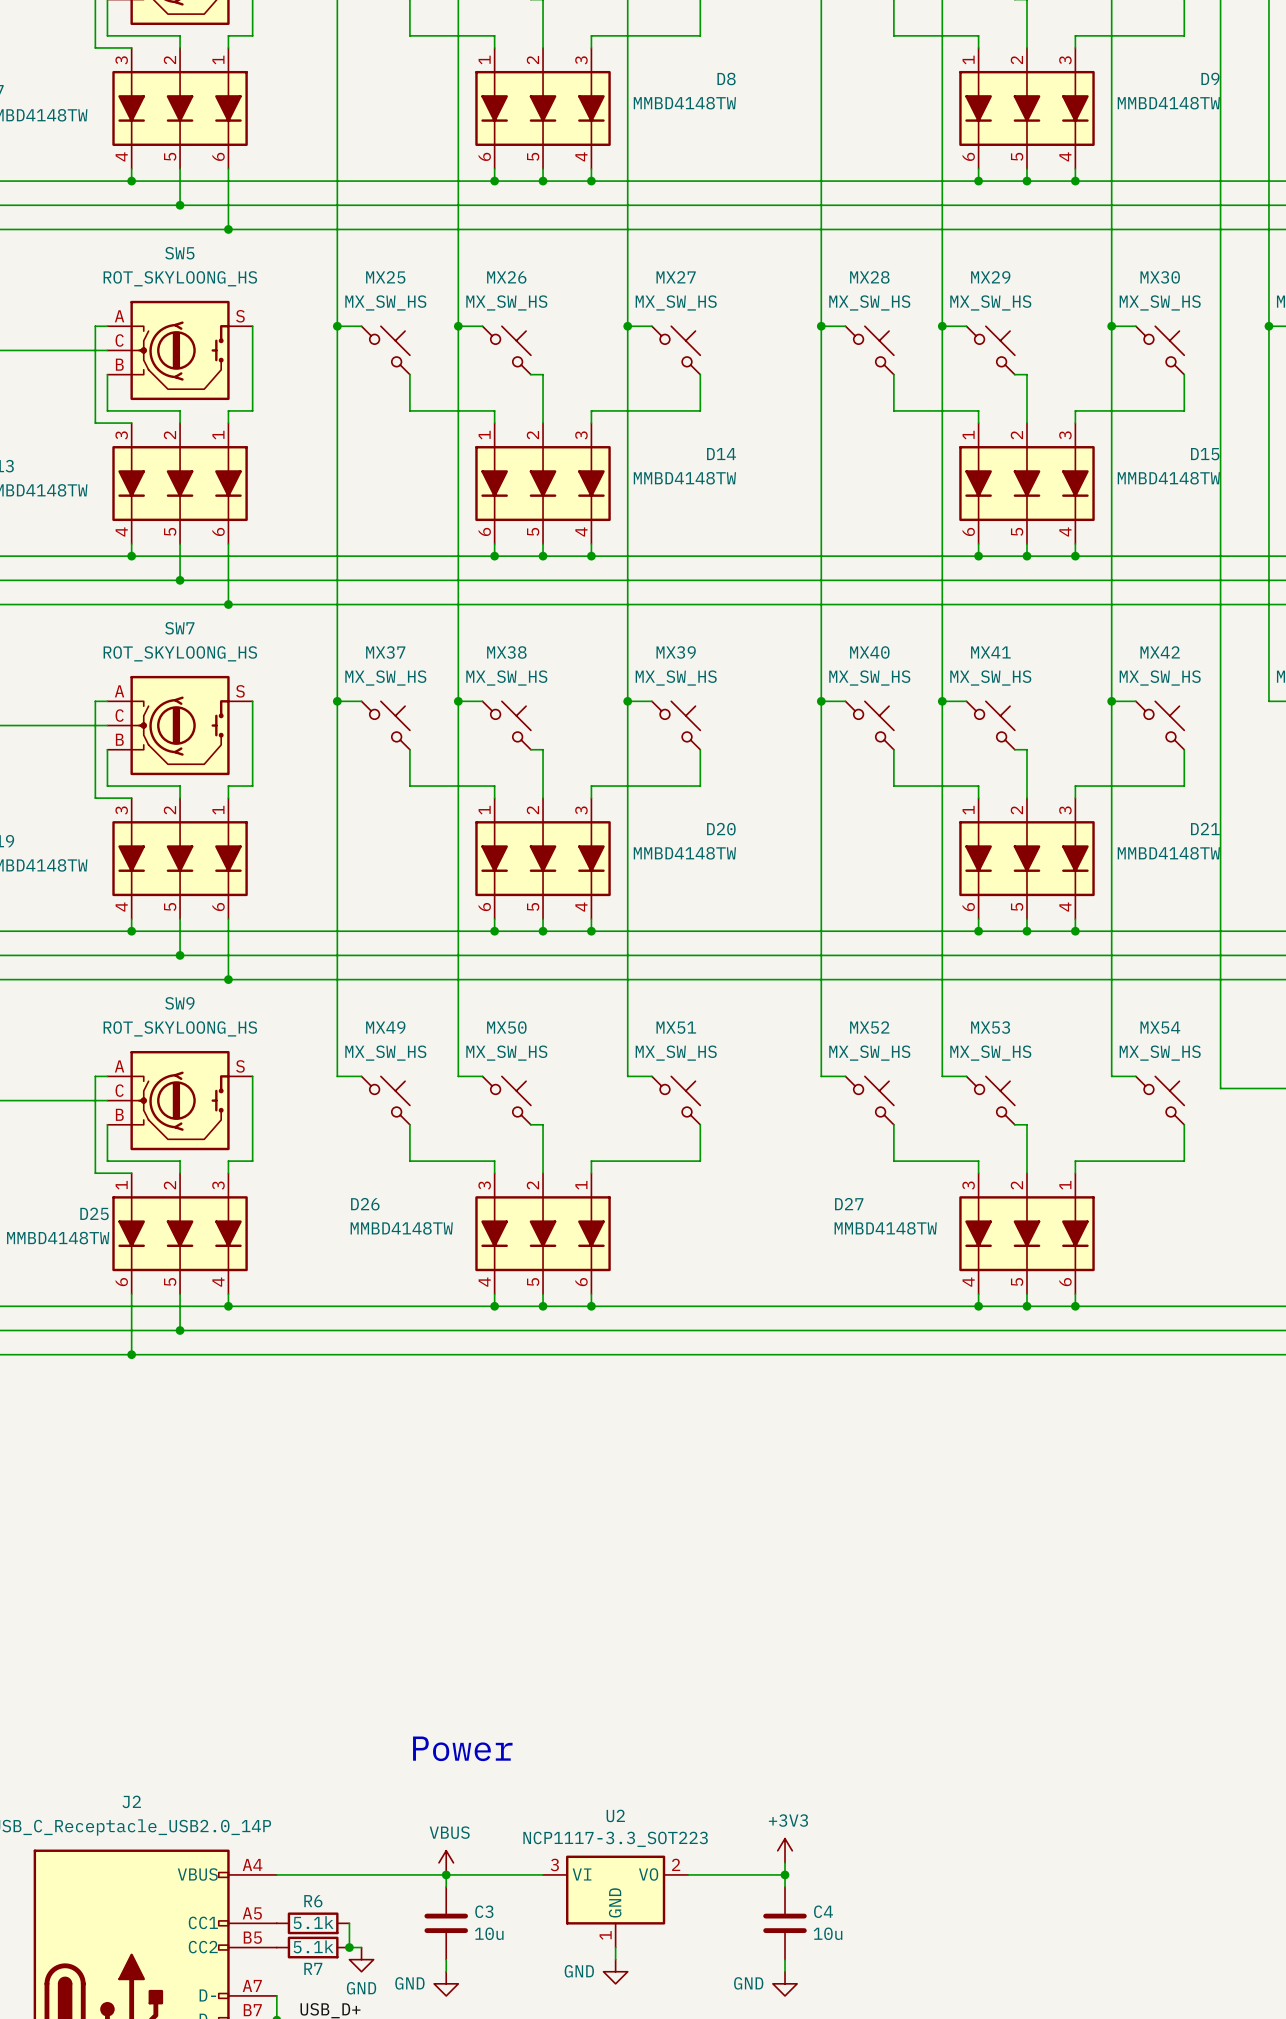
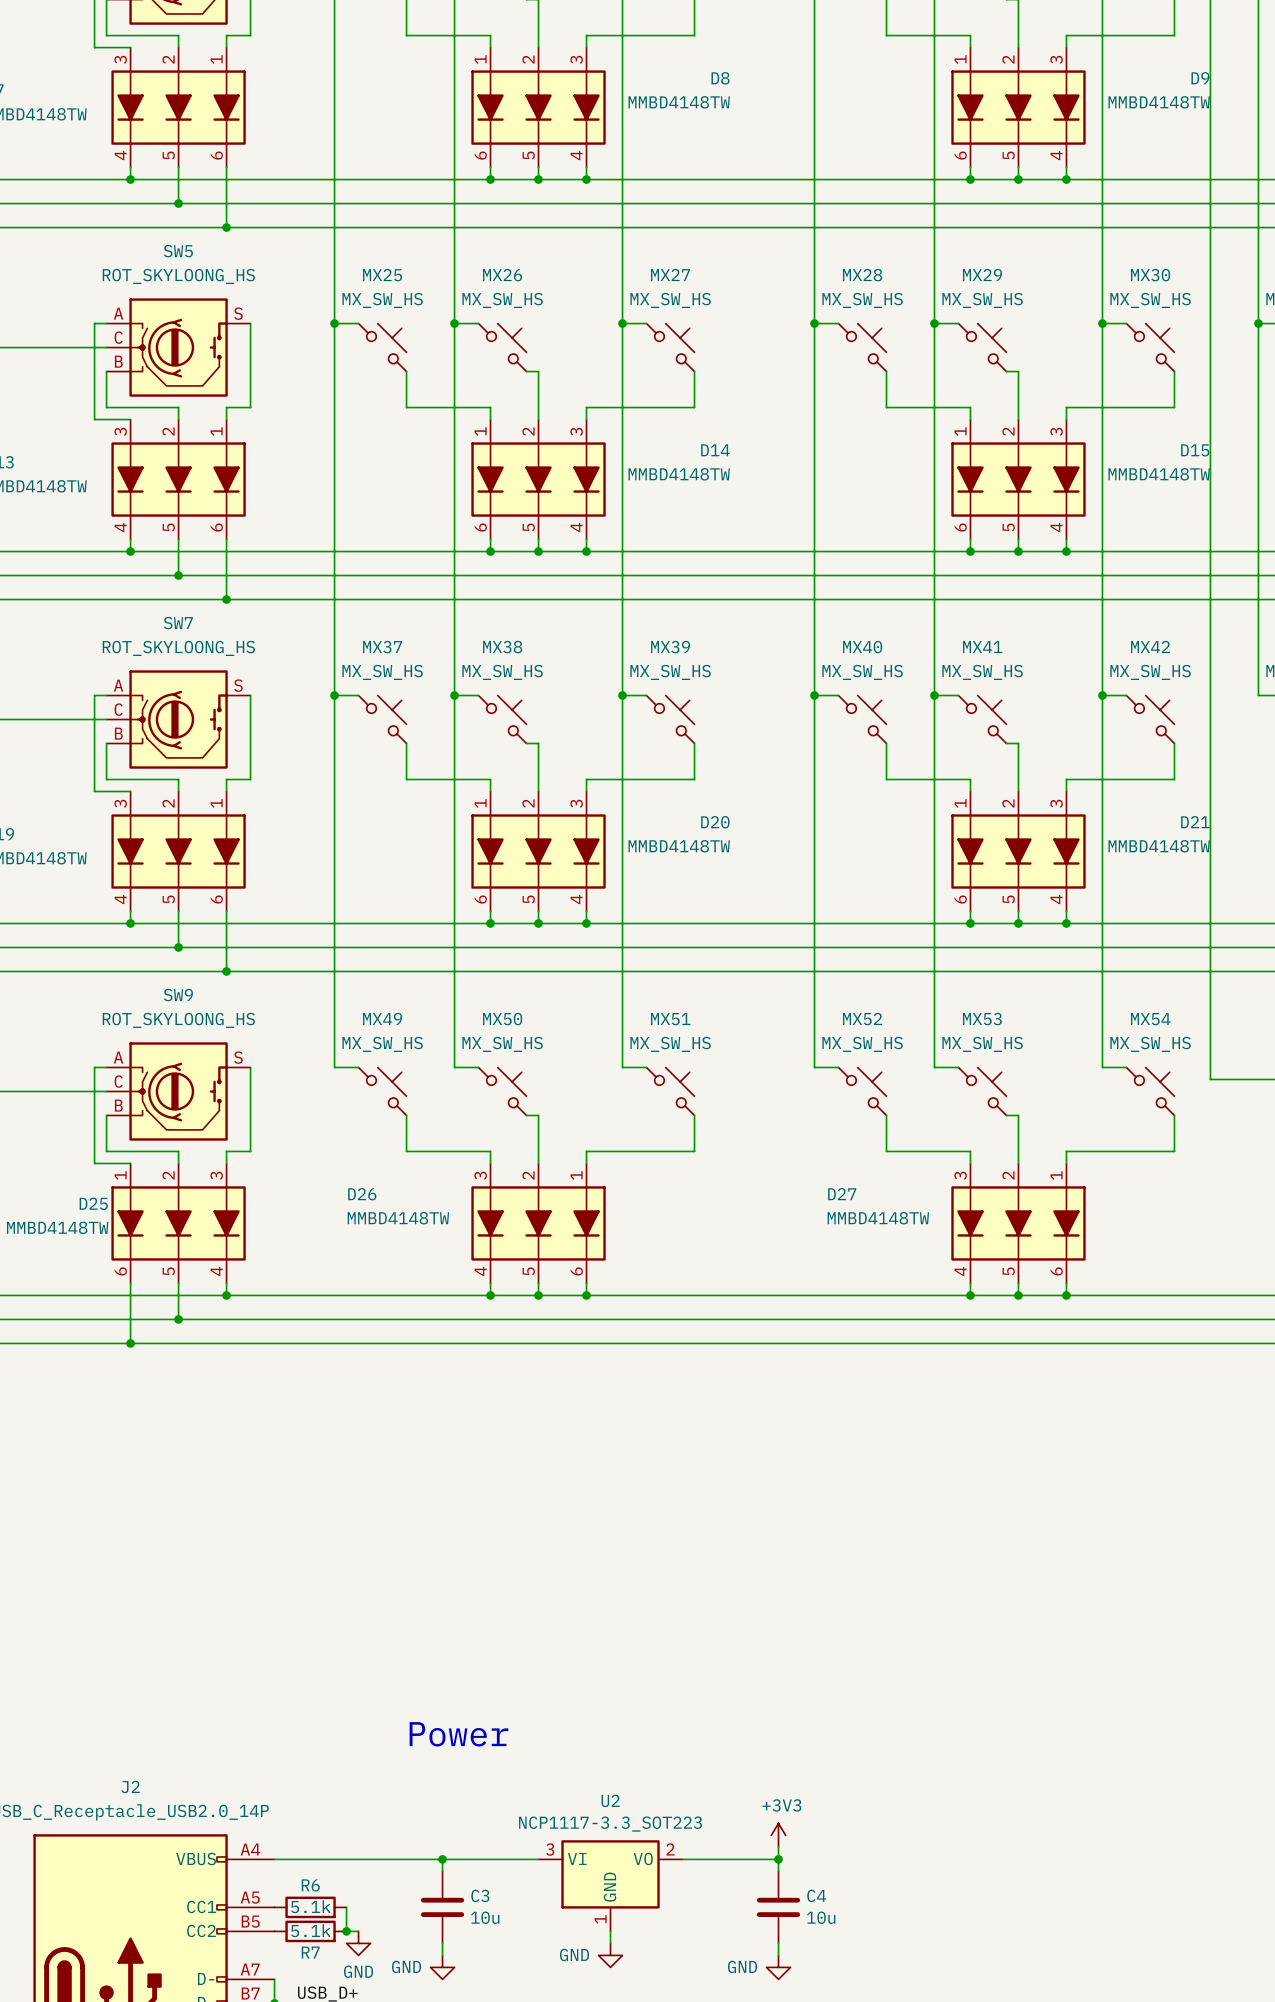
power symbol: VBUS (446, 1862) -> none

